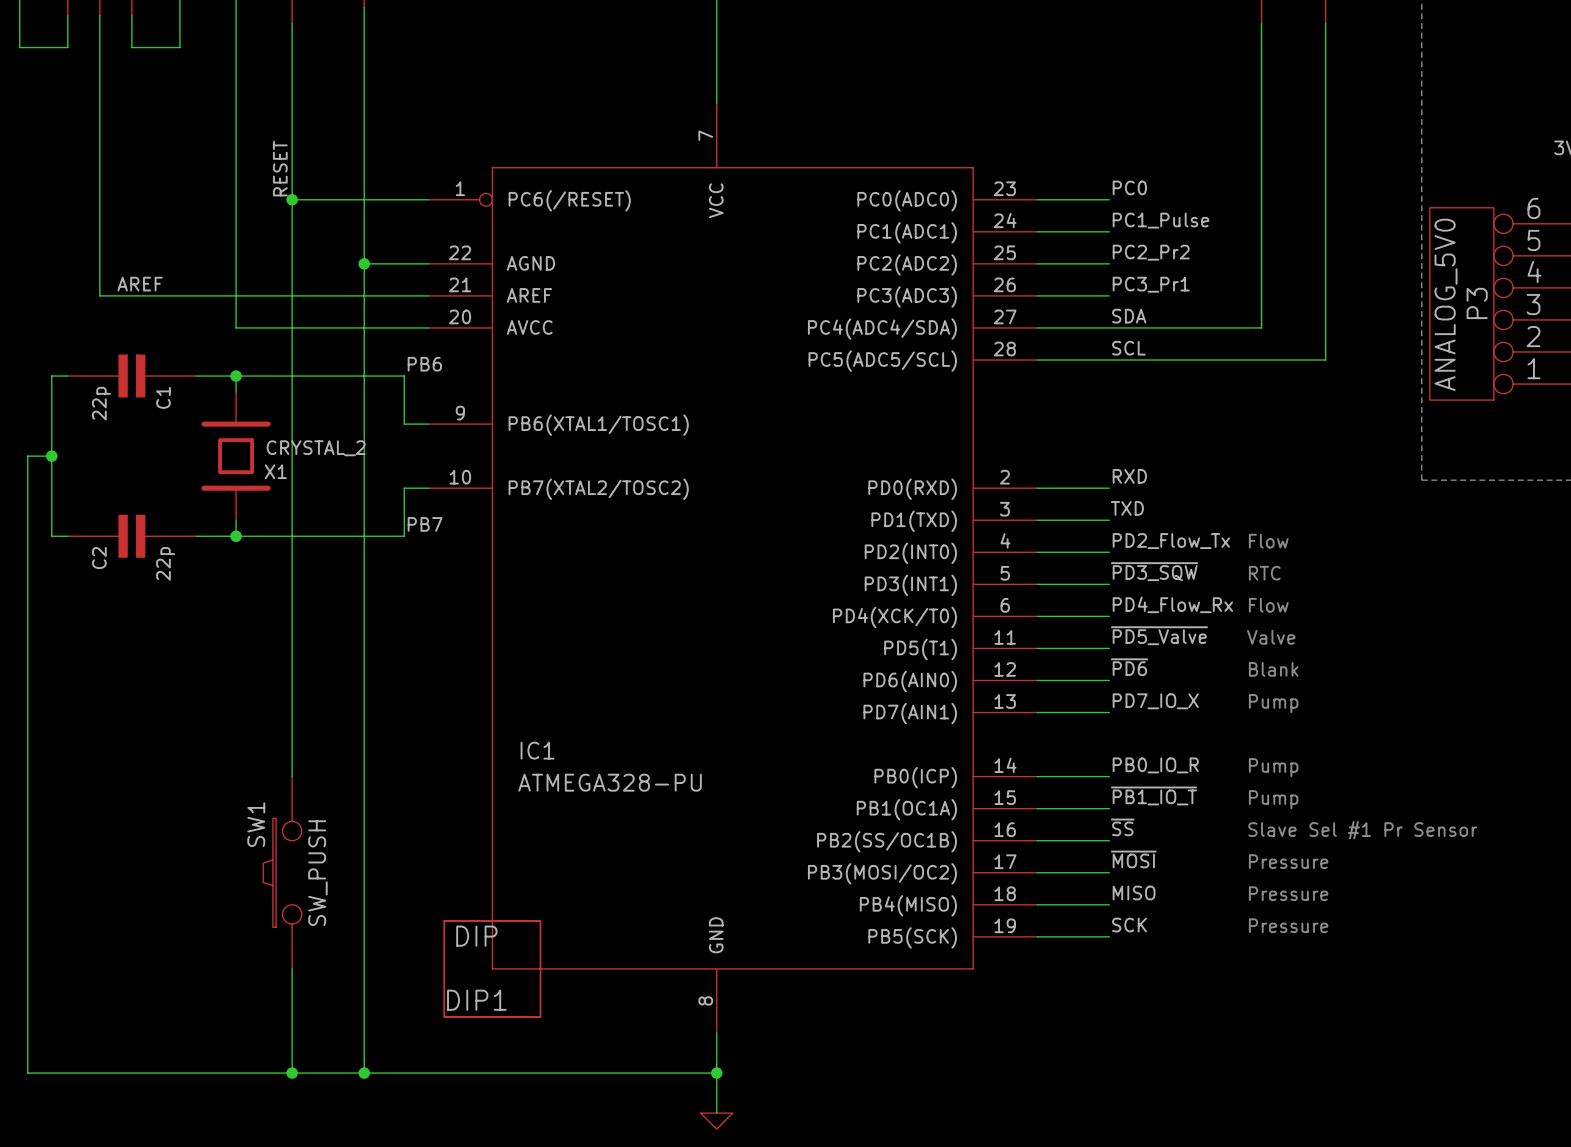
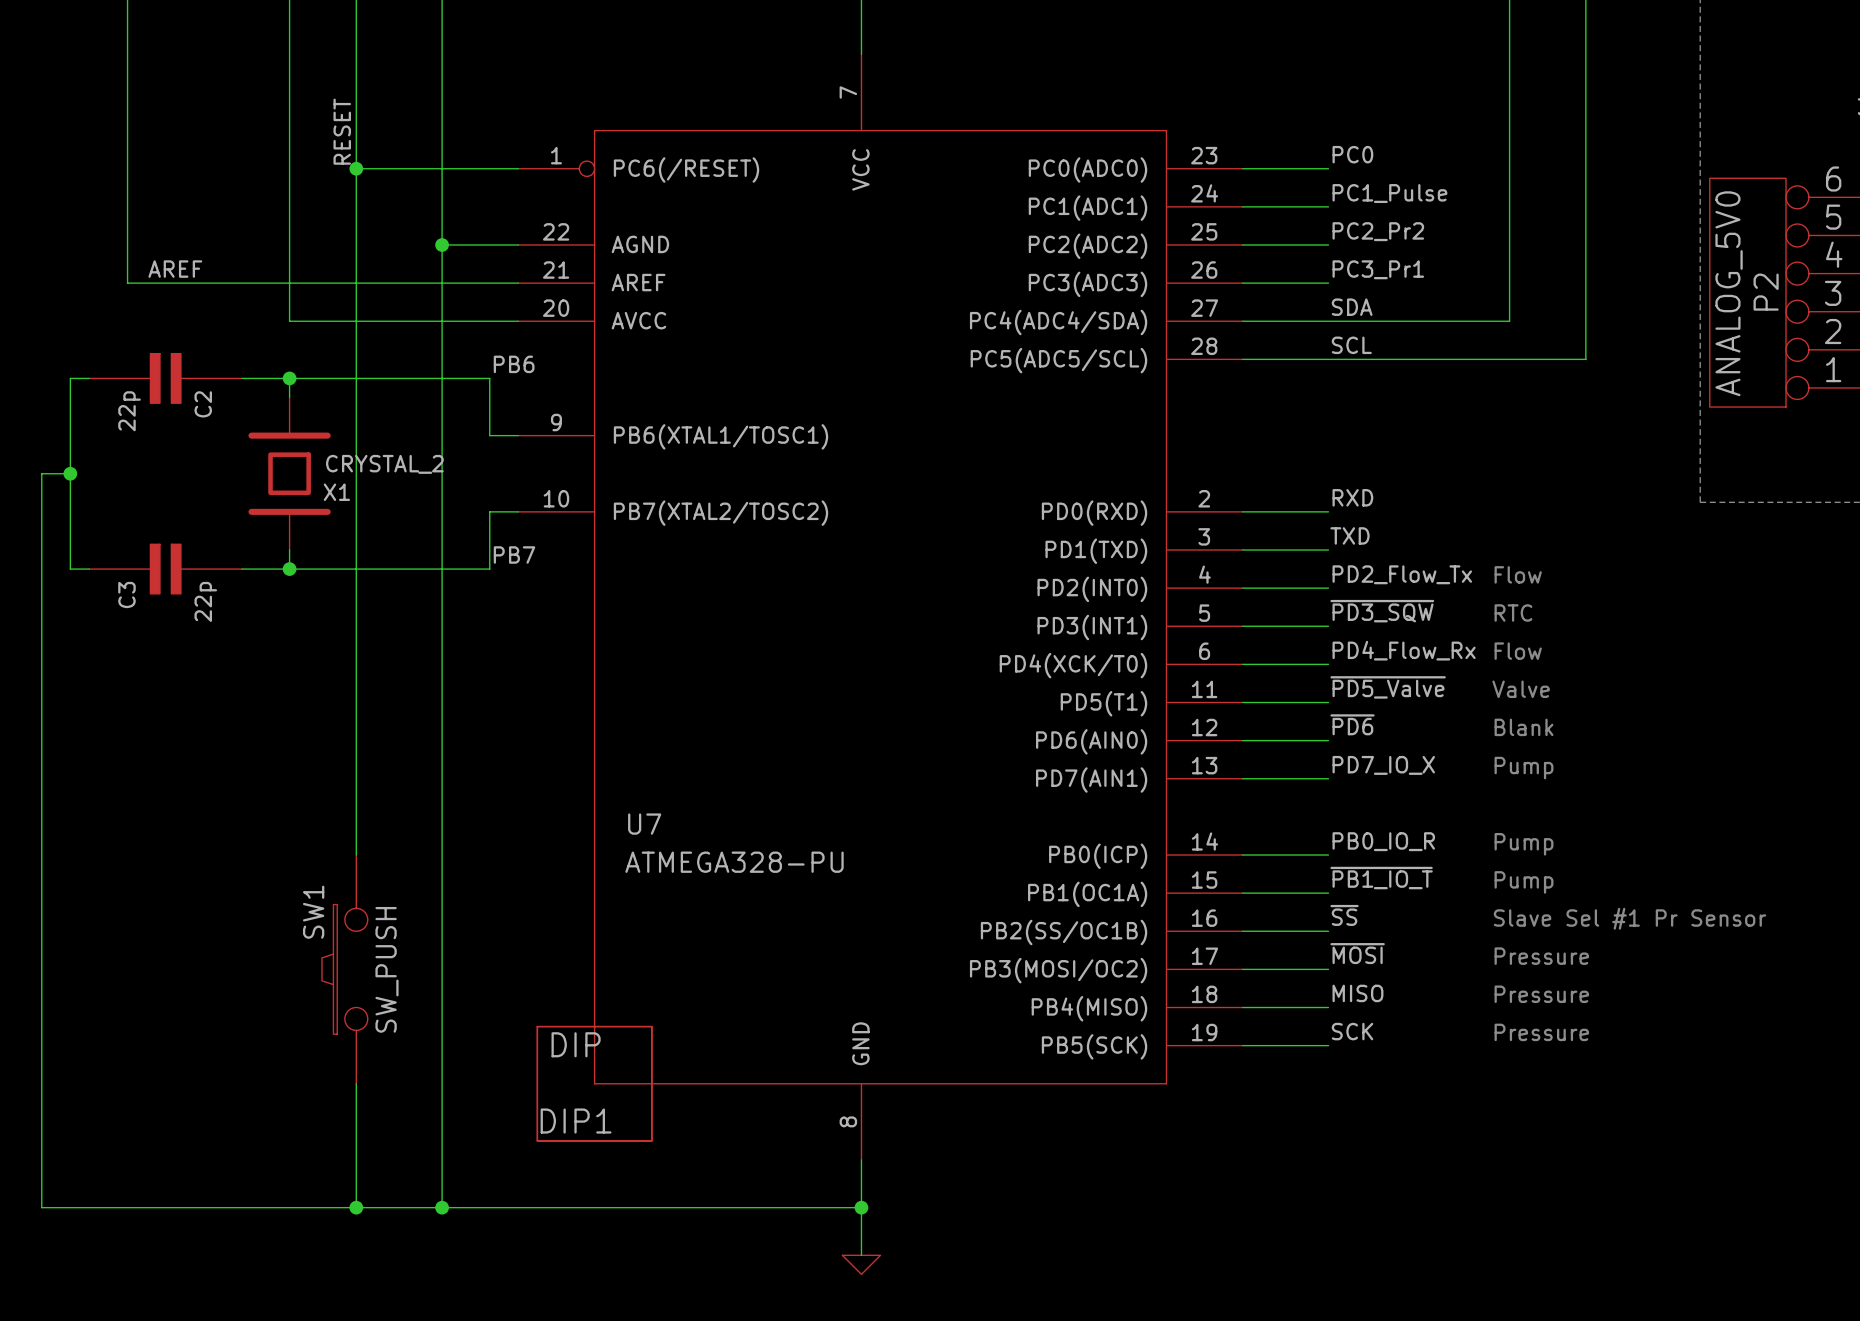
P3 name: P3 (1477, 303) -> P2 (1766, 292)
C1 name: C1 (163, 397) -> C2 (203, 404)
C2 name: C2 (99, 558) -> C3 (126, 594)
IC1 name: IC1 (537, 750) -> U7 (644, 824)

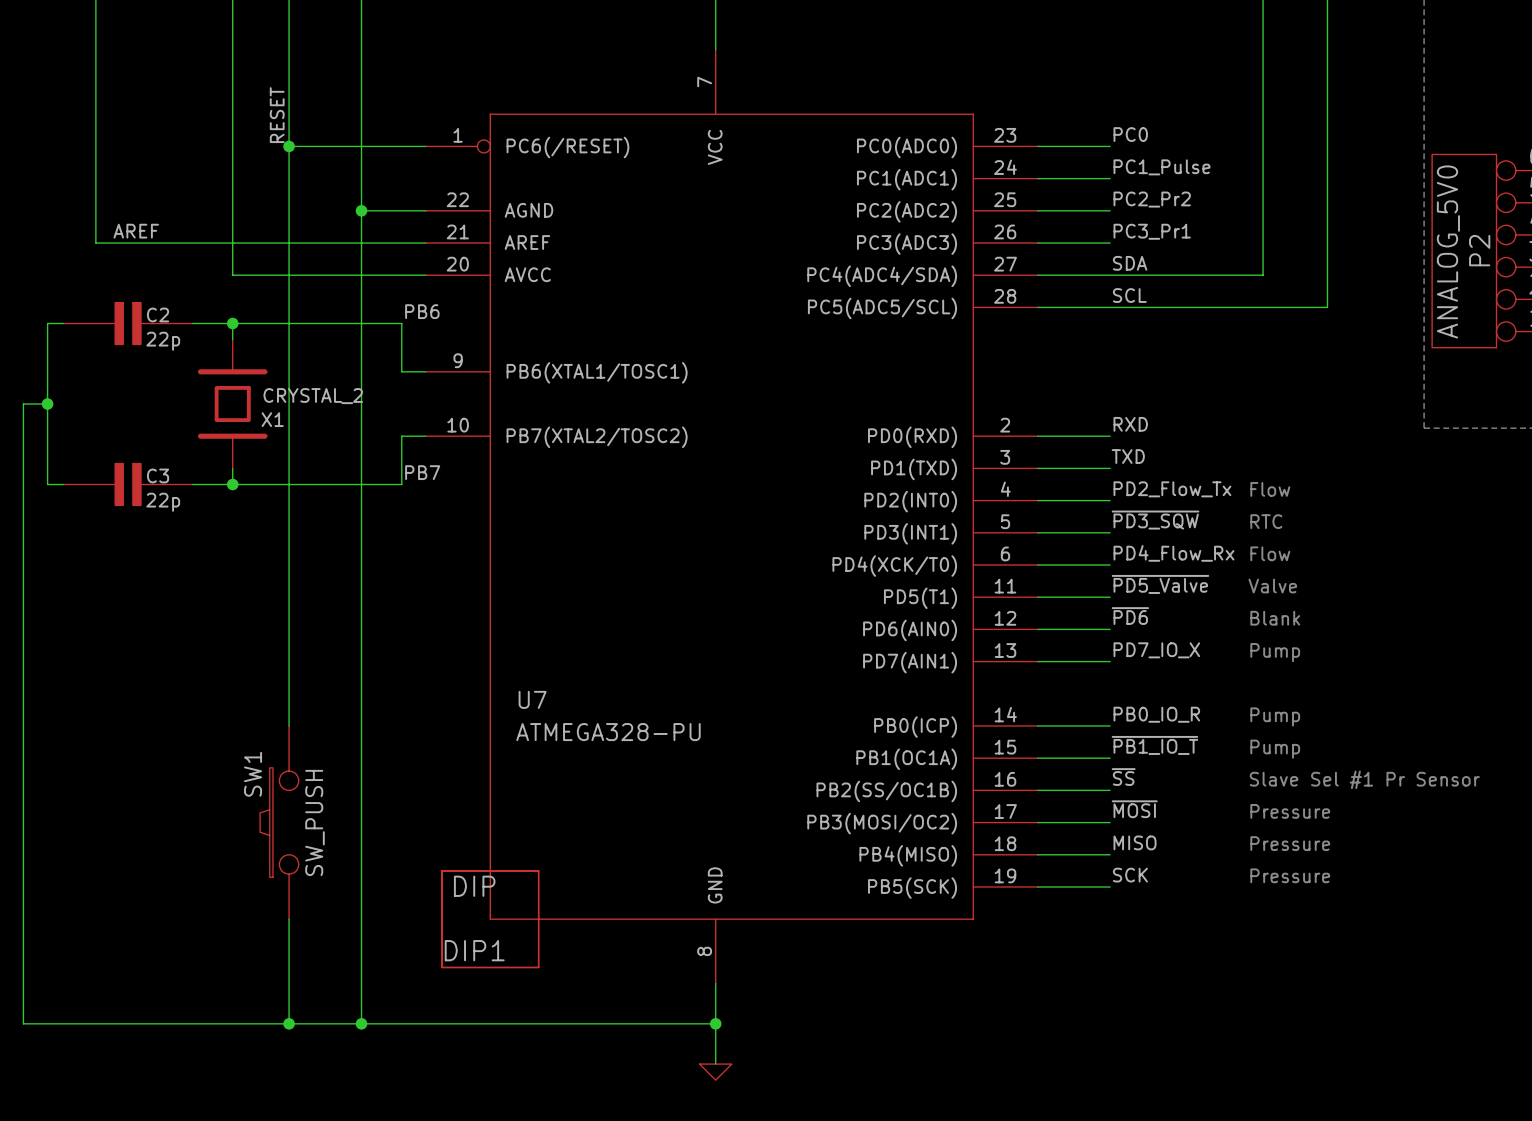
C2 name rotation: 0° (203, 404) -> 90° clockwise (158, 314)
C2 value rotation: 0° (129, 411) -> 90° clockwise (163, 341)
C2 value position: 22p (129, 411) -> 22p (163, 341)
C3 name rotation: 0° (126, 594) -> 90° clockwise (158, 475)
C3 name position: C3 (126, 594) -> C3 (158, 475)
C3 value rotation: 0° (205, 601) -> 90° clockwise (163, 502)

